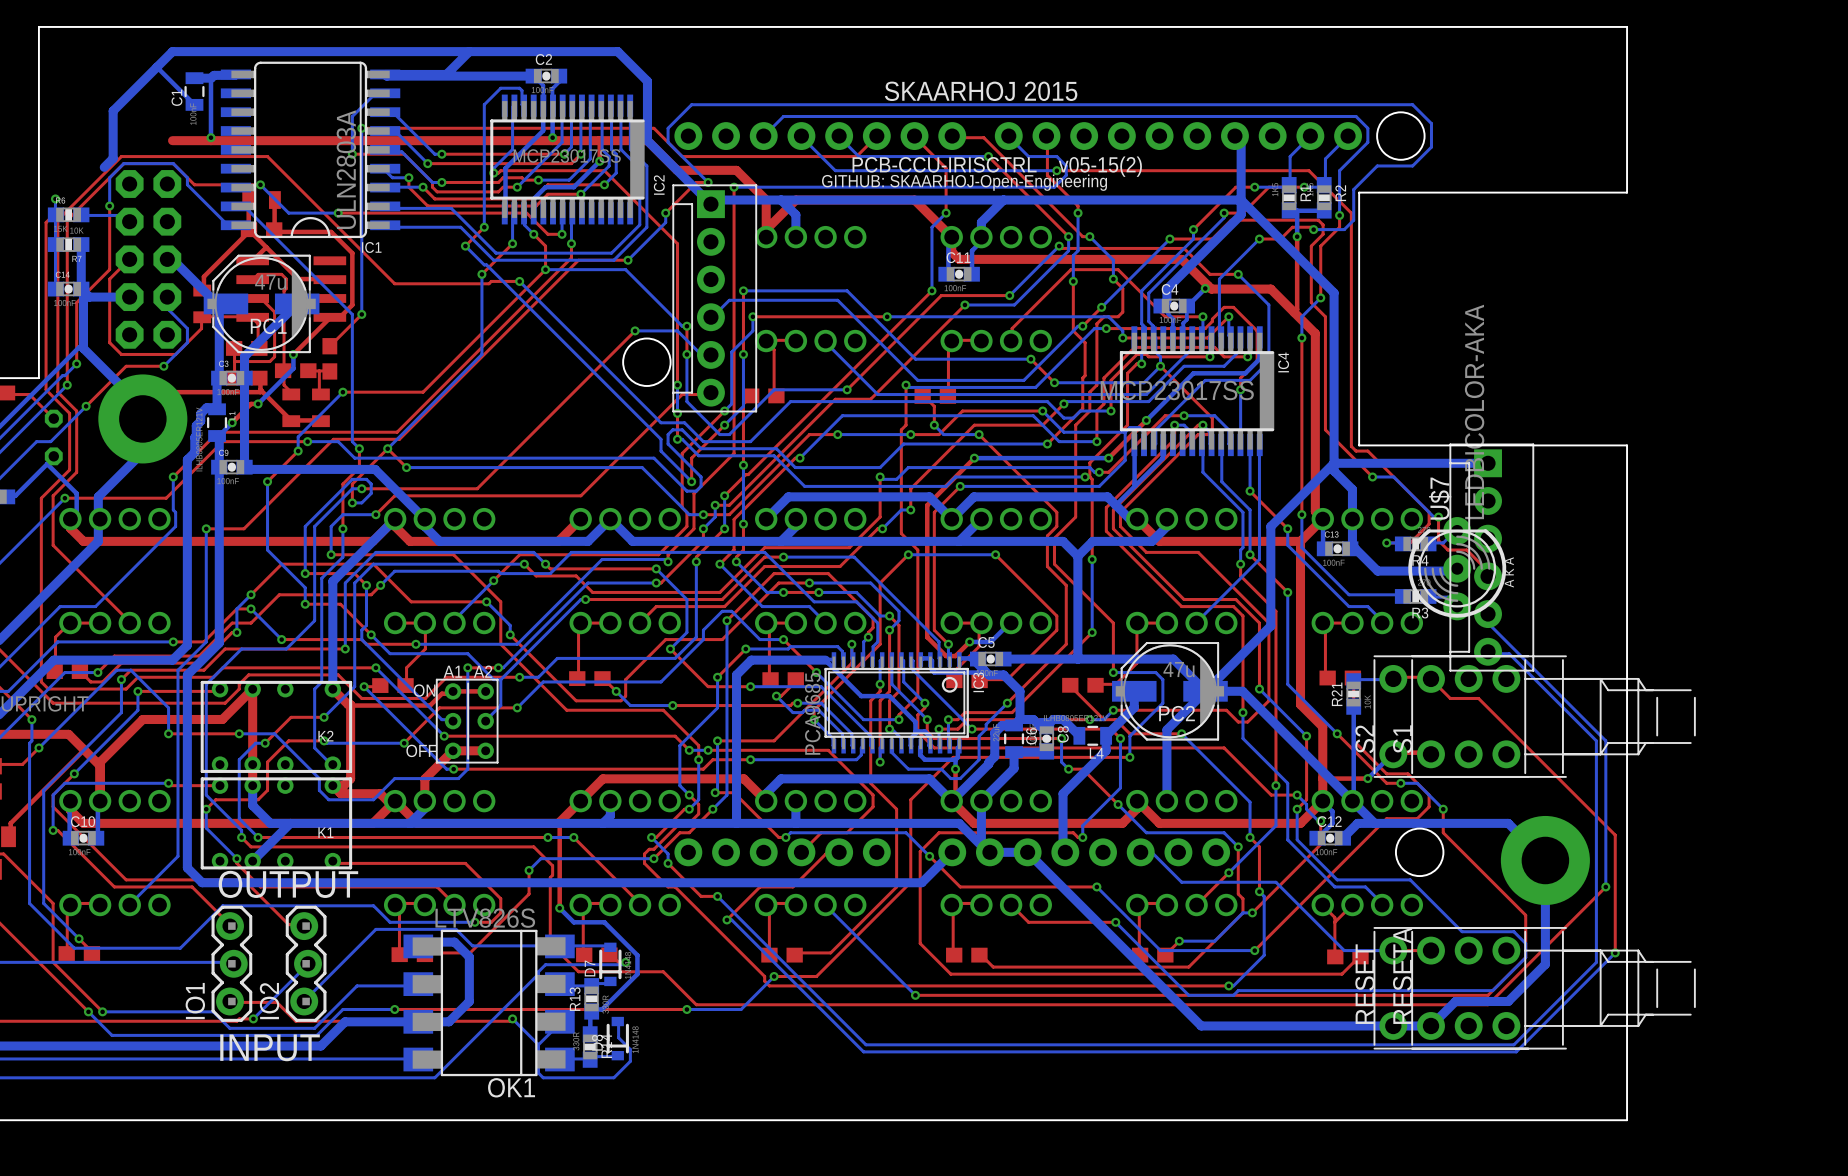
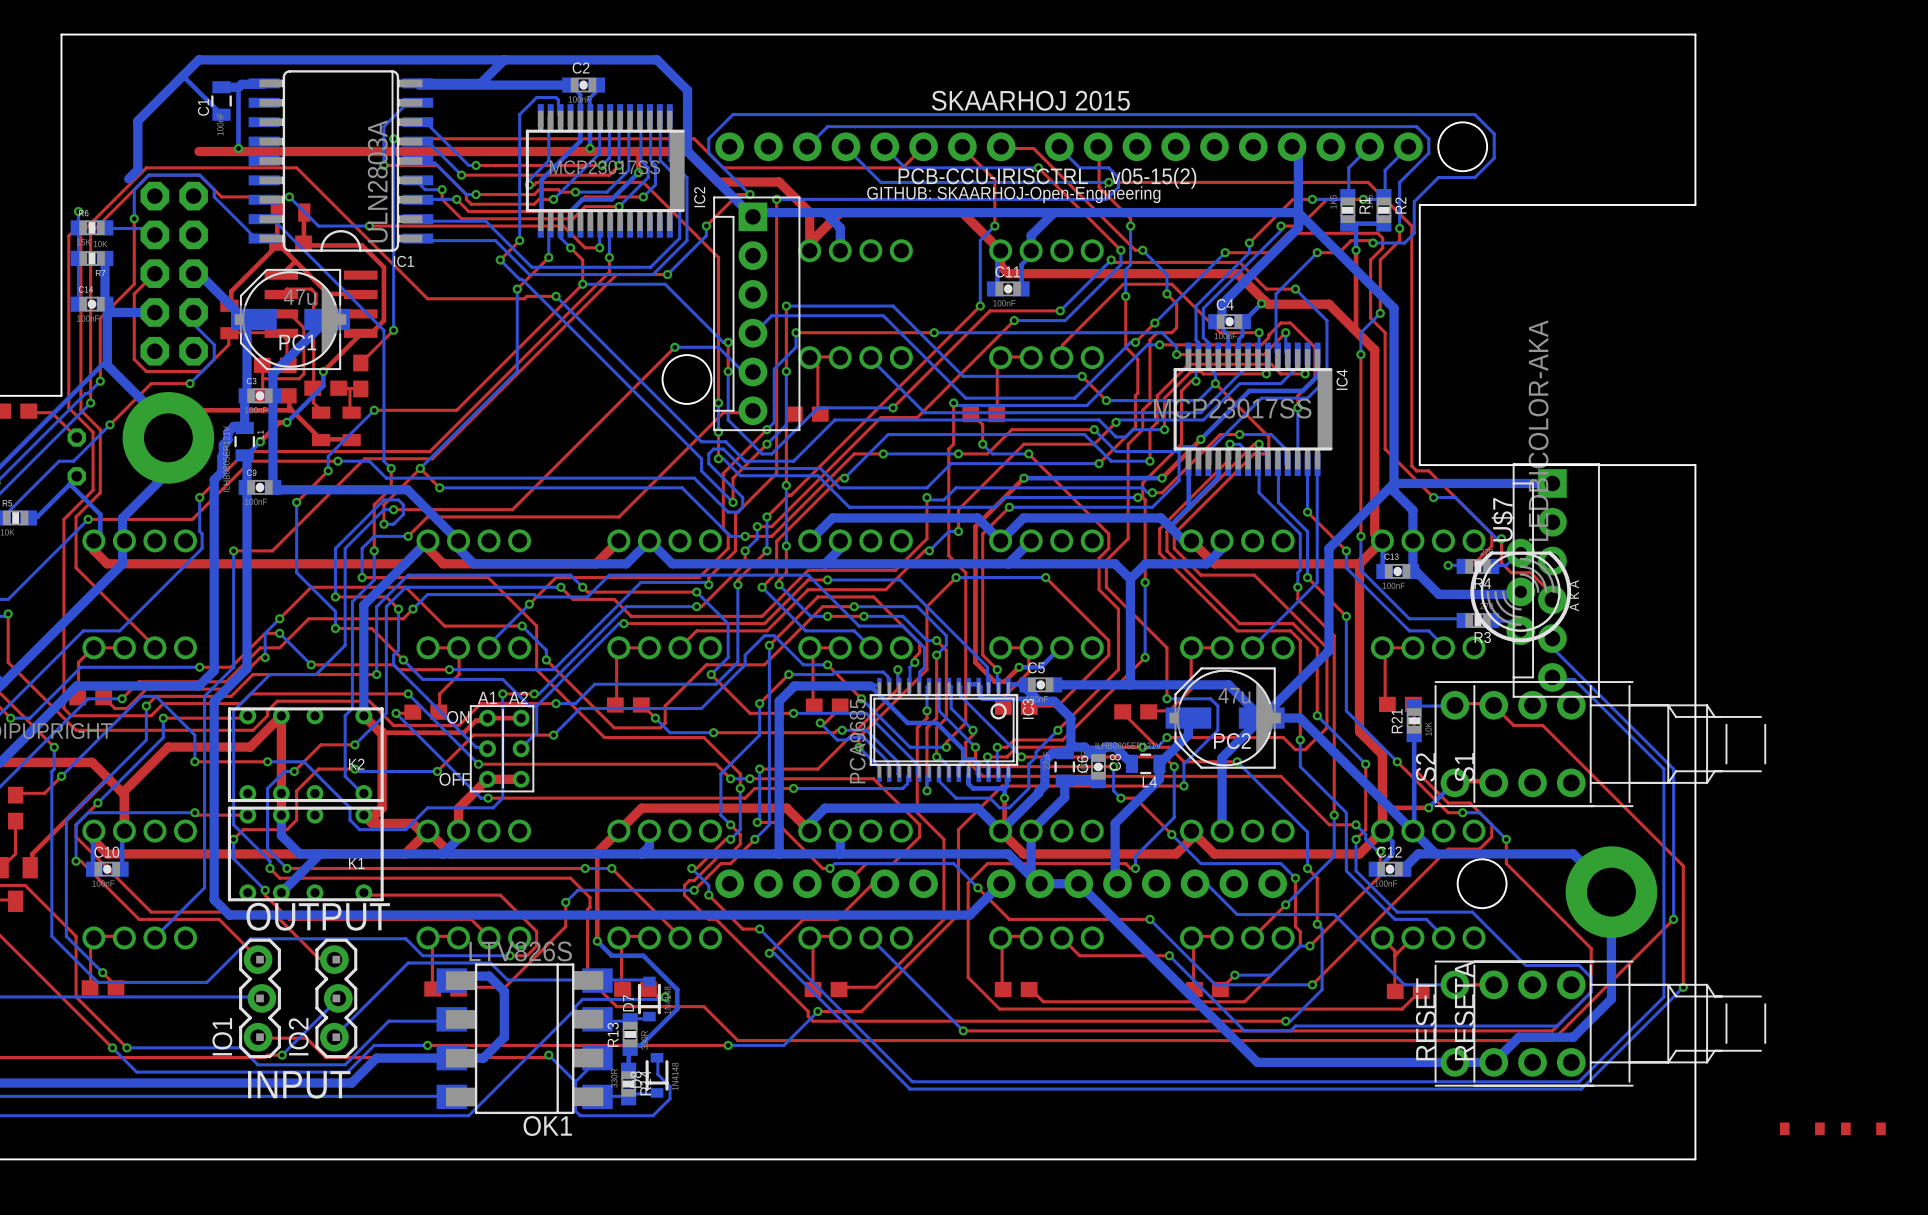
part: none -> (1802, 1128)
part: none -> (1863, 1128)

